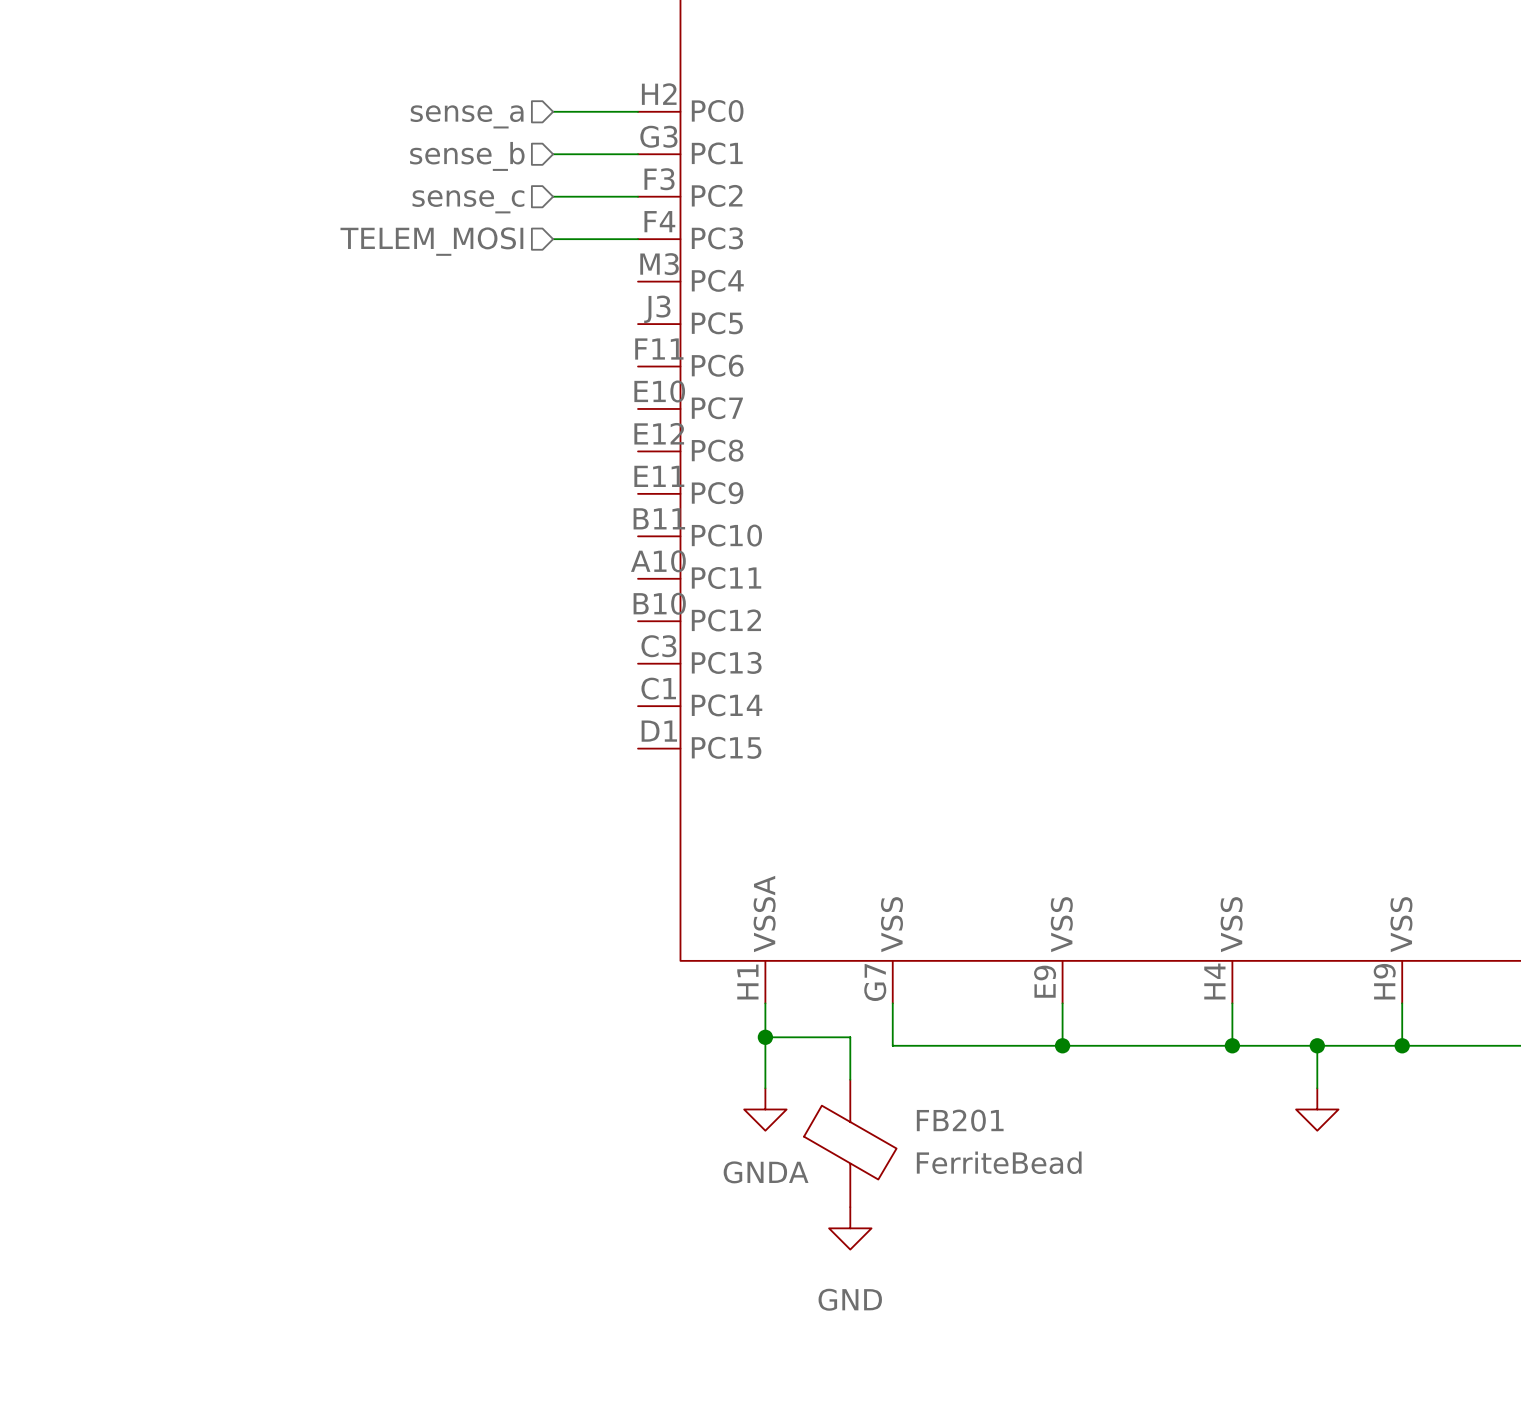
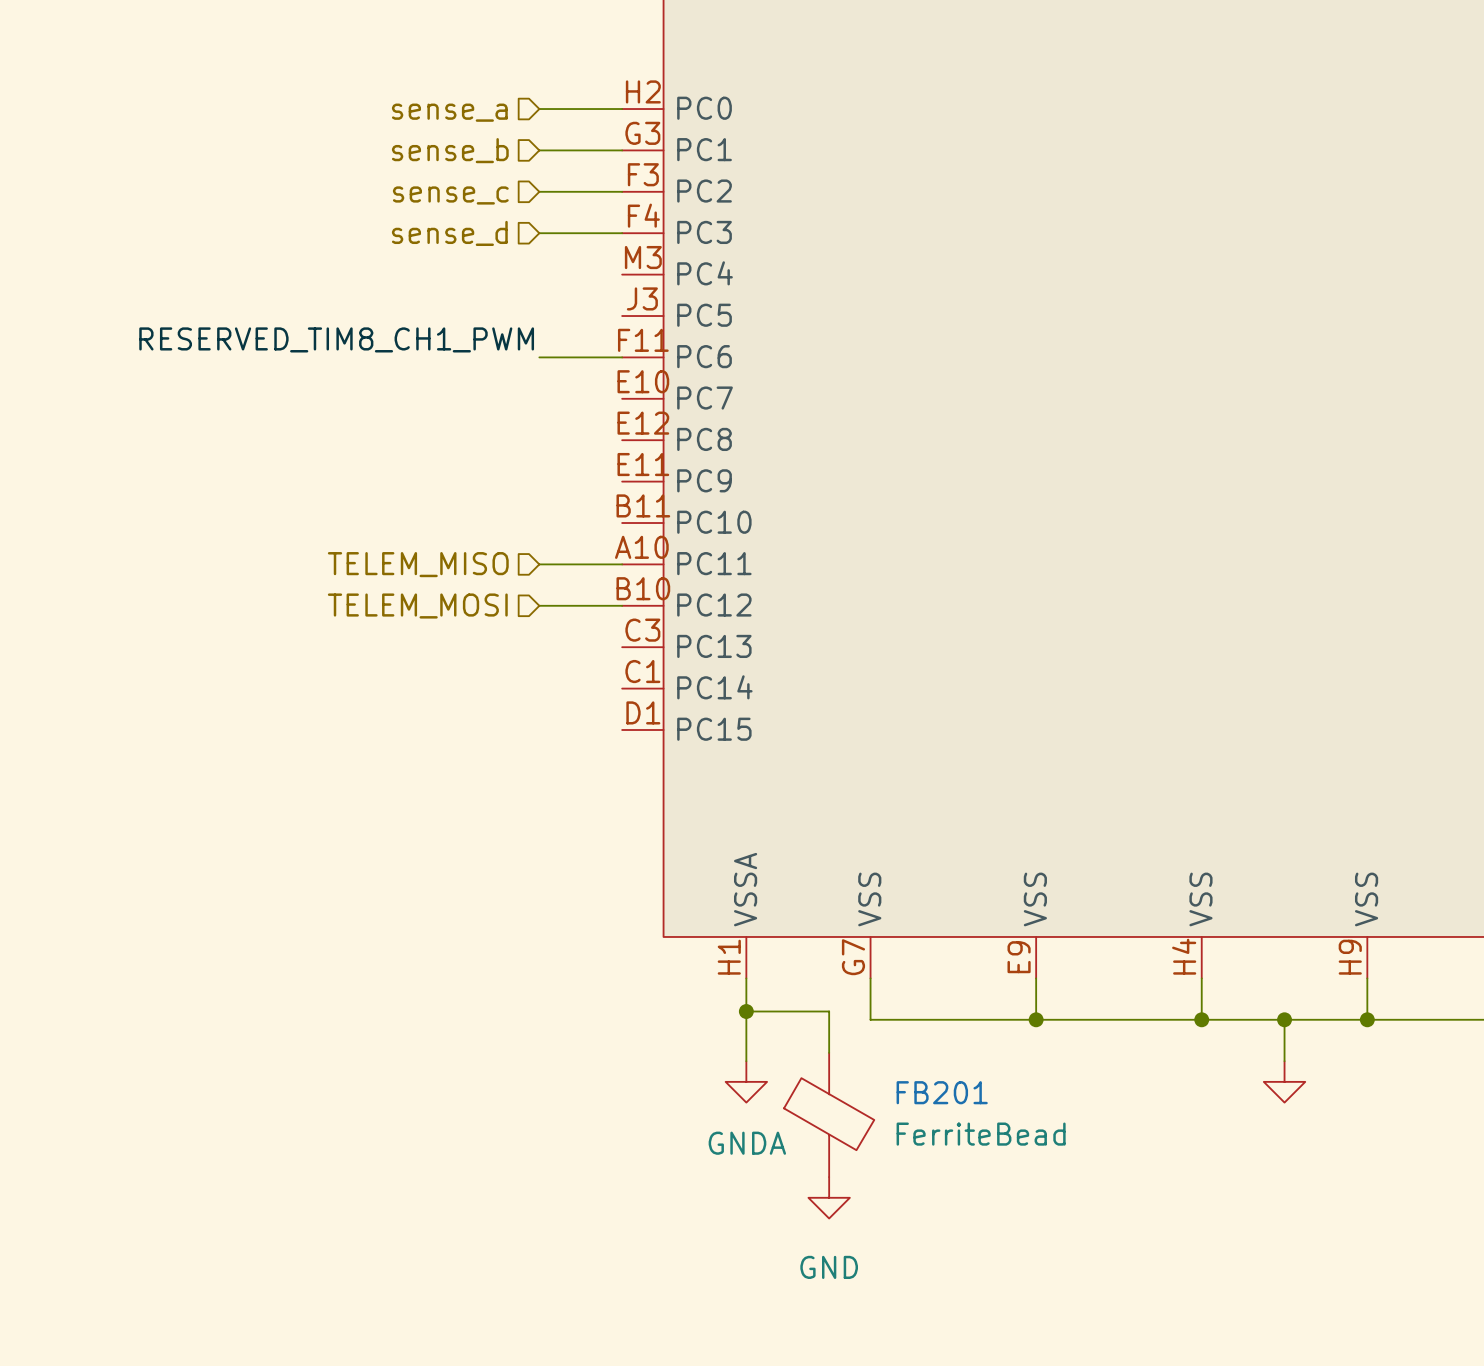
hierarchical label: TELEM_MOSI (431, 241) -> sense_d (449, 233)
label: none -> RESERVED_TIM8_CH1_PWM (336, 339)
wire: none -> (539, 357) (622, 357)
wire: none -> (539, 564) (622, 564)
hierarchical label: none -> TELEM_MISO (418, 564)
wire: none -> (539, 605) (622, 605)
hierarchical label: none -> TELEM_MOSI (417, 606)

